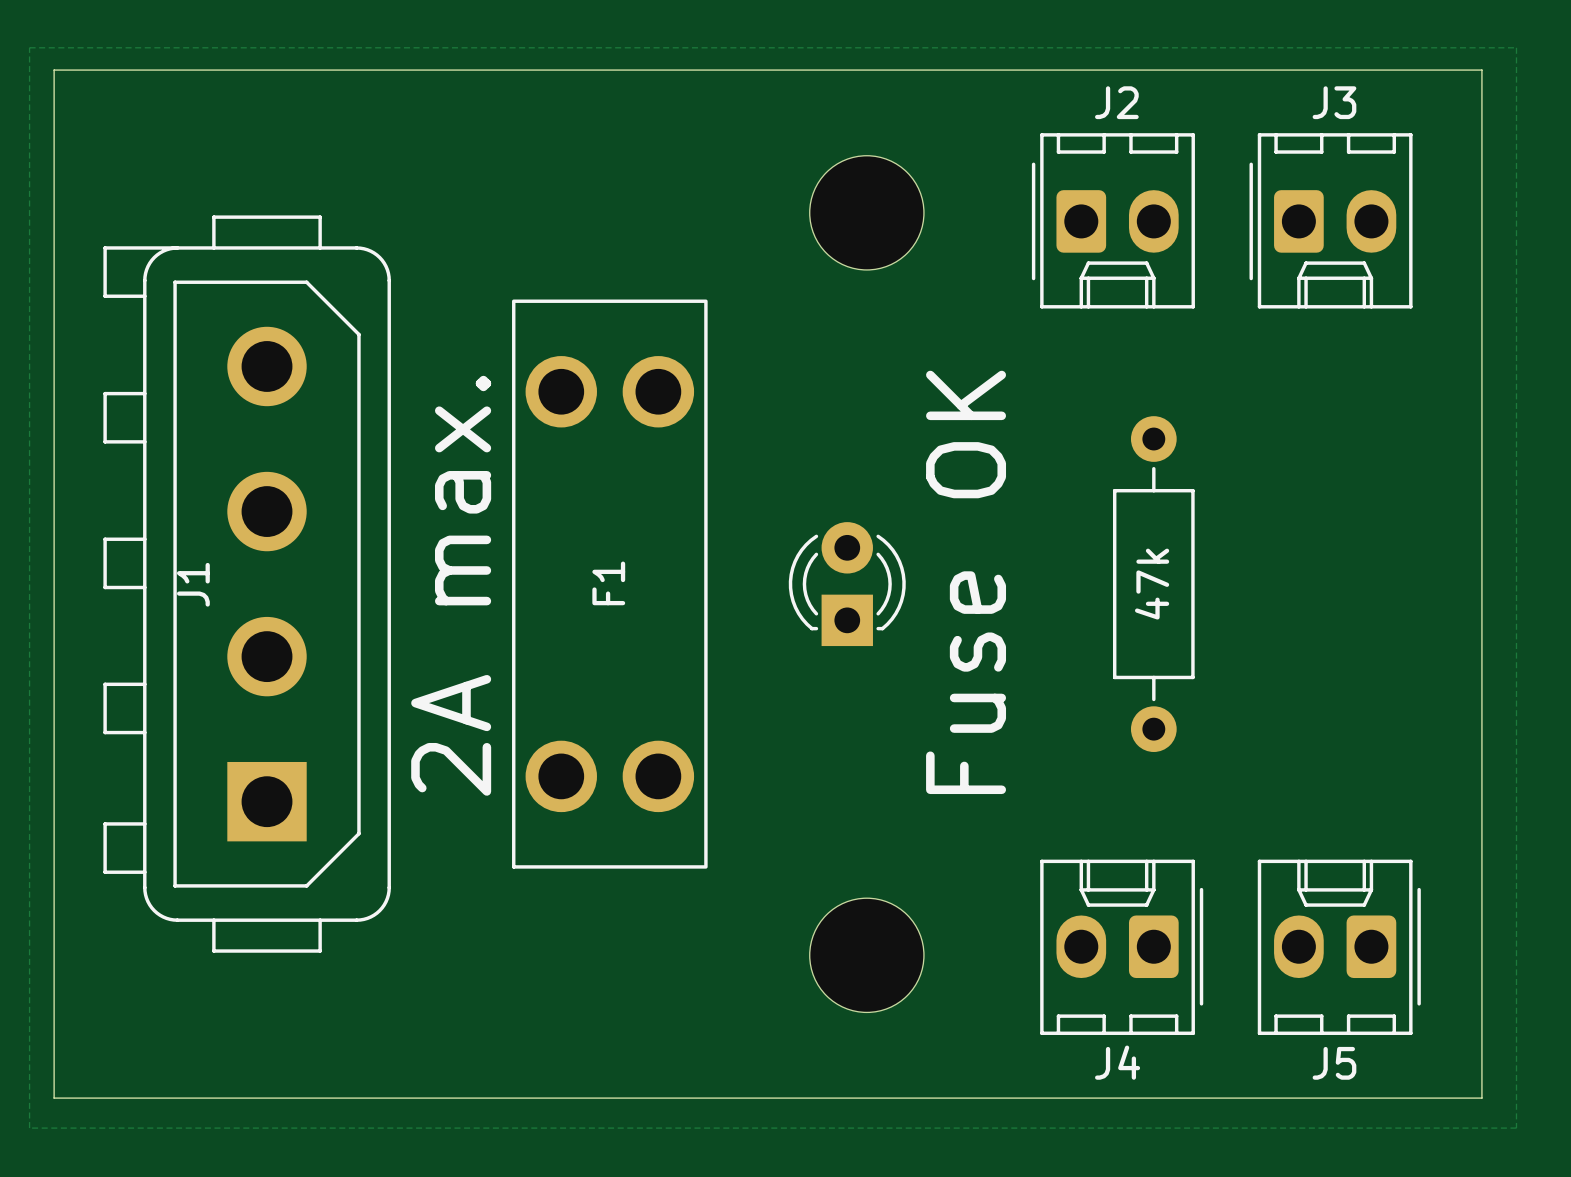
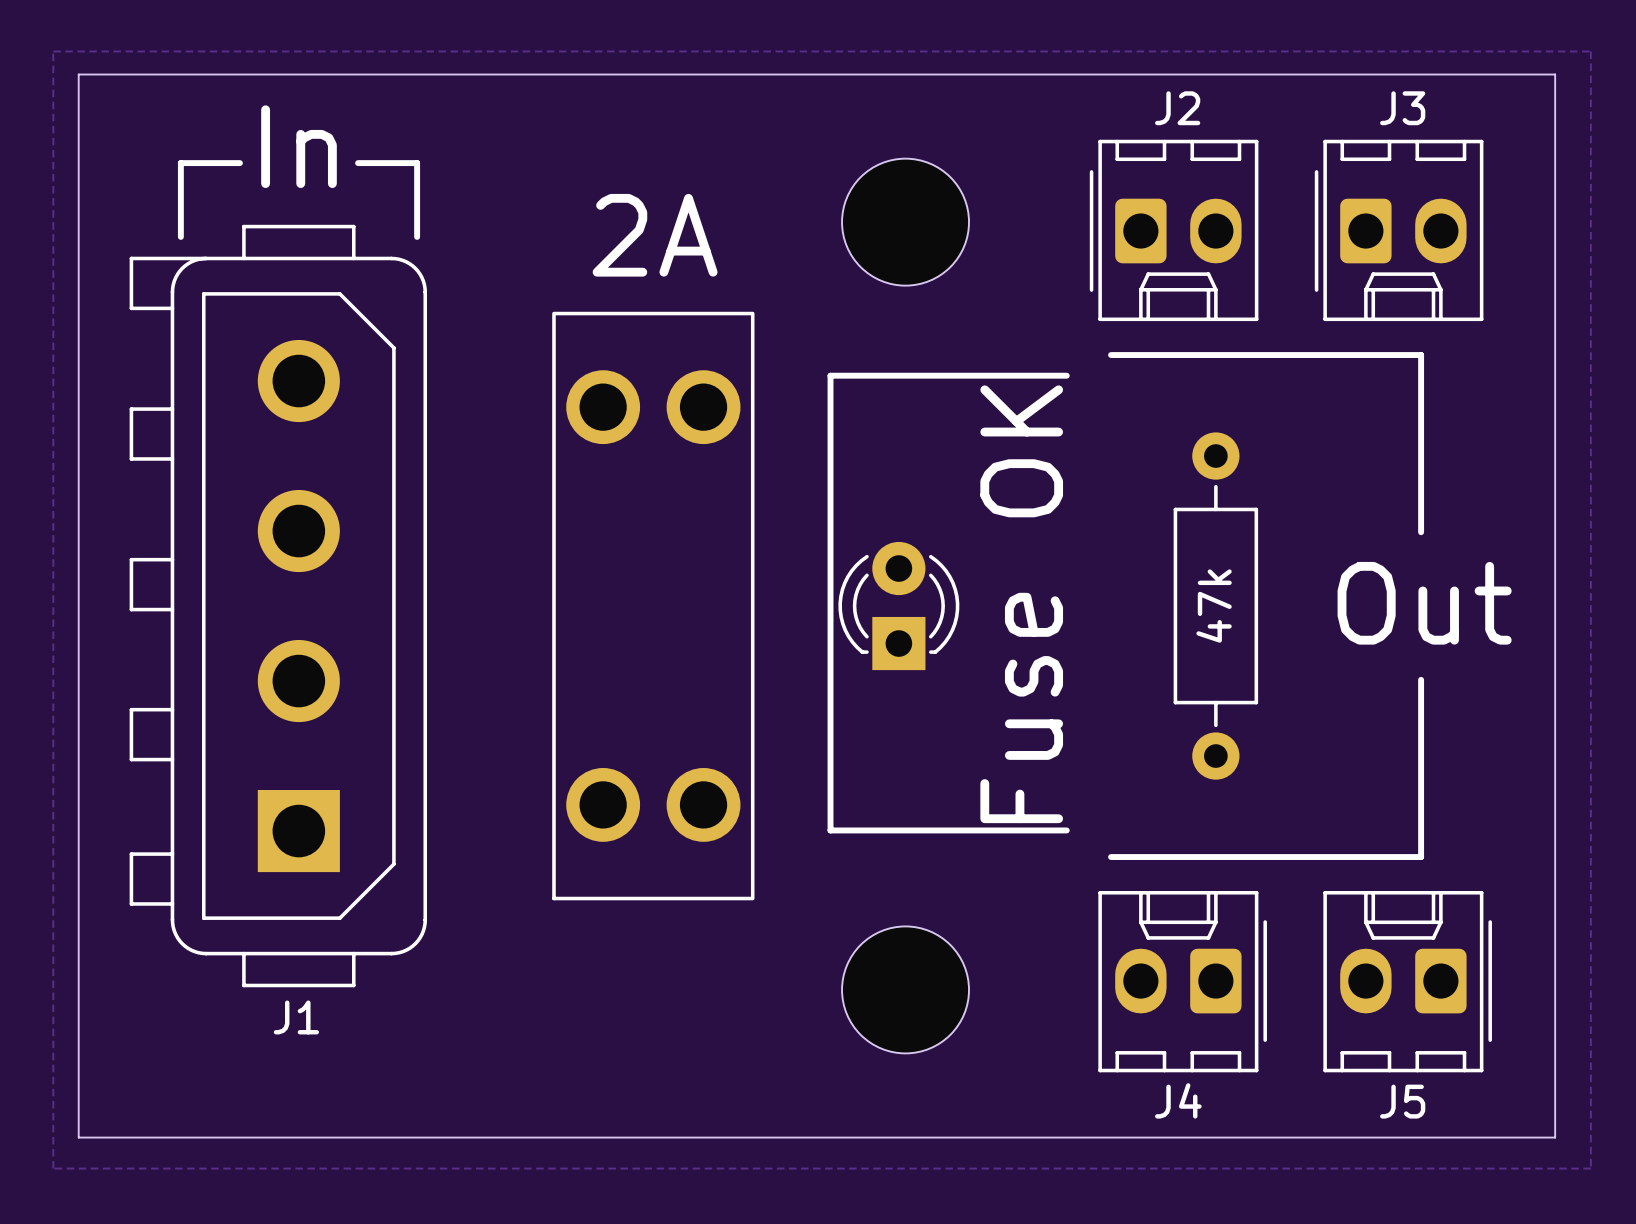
text: none -> In (298, 146)
line: none -> (239, 163) (180, 163) (180, 236)
line: none -> (358, 163) (417, 163) (417, 236)
part footprint: [809, 155, 924, 270] -> [842, 158, 970, 286]
text: none -> 2A (655, 235)
line: none -> (1111, 355) (1421, 355) (1421, 532)
line: none -> (1066, 375) (830, 375) (830, 830) (1066, 830)
text: none -> Out (1424, 603)
F1 name: F1 (608, 583) -> none
J1 name rotation: 0° (193, 584) -> 90° clockwise (296, 1017)
J1 name position: J1 (193, 584) -> J1 (296, 1017)
text: 2A max. (451, 585) -> none
line: none -> (1421, 679) (1421, 857) (1111, 857)
part footprint: [809, 898, 924, 1013] -> [842, 926, 970, 1054]

